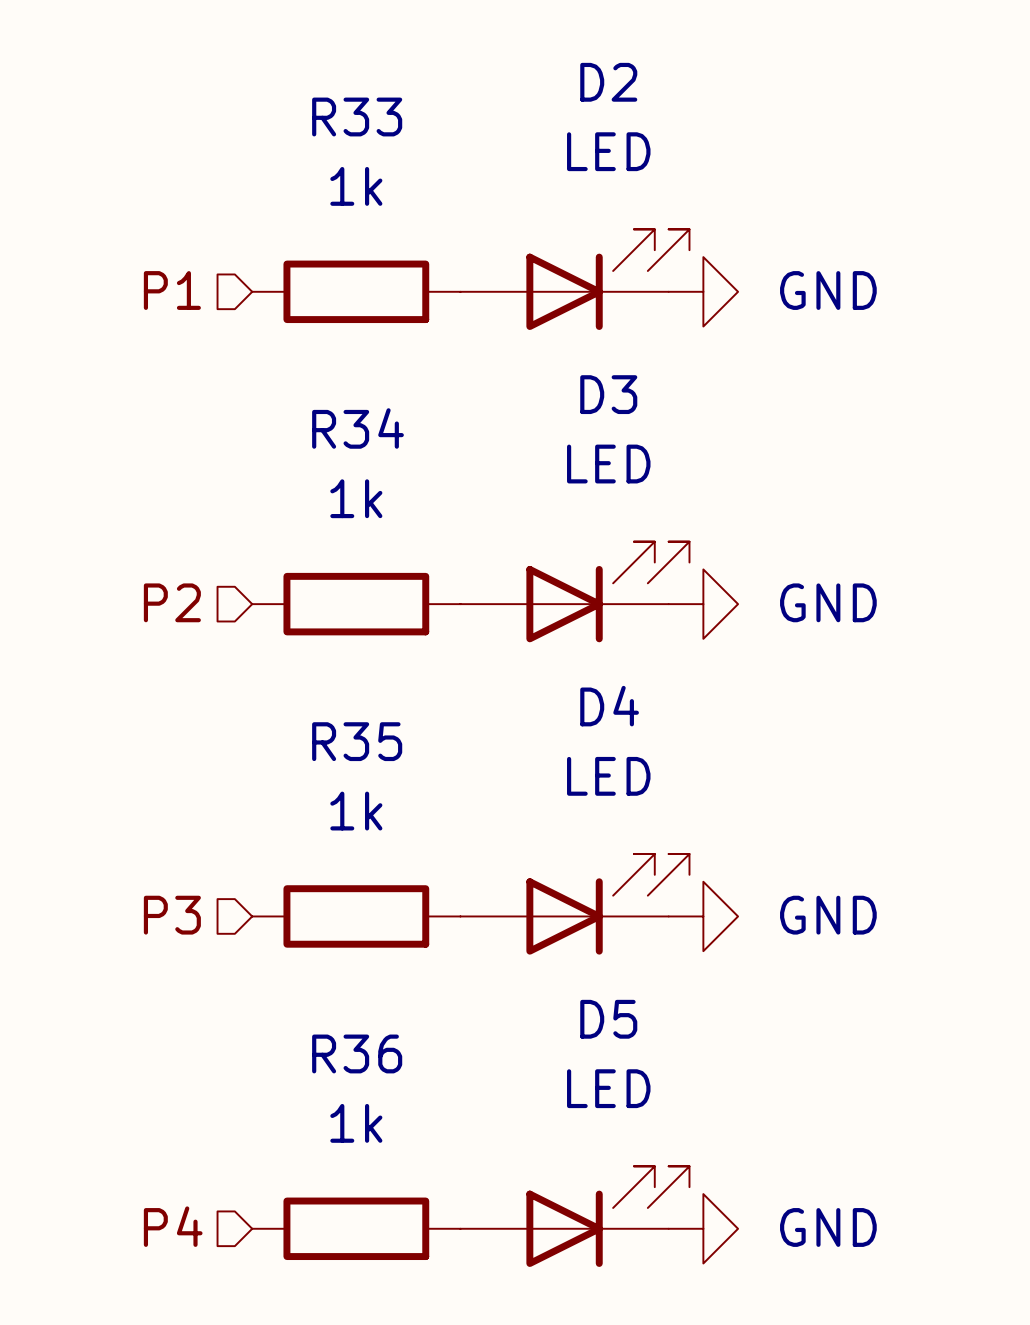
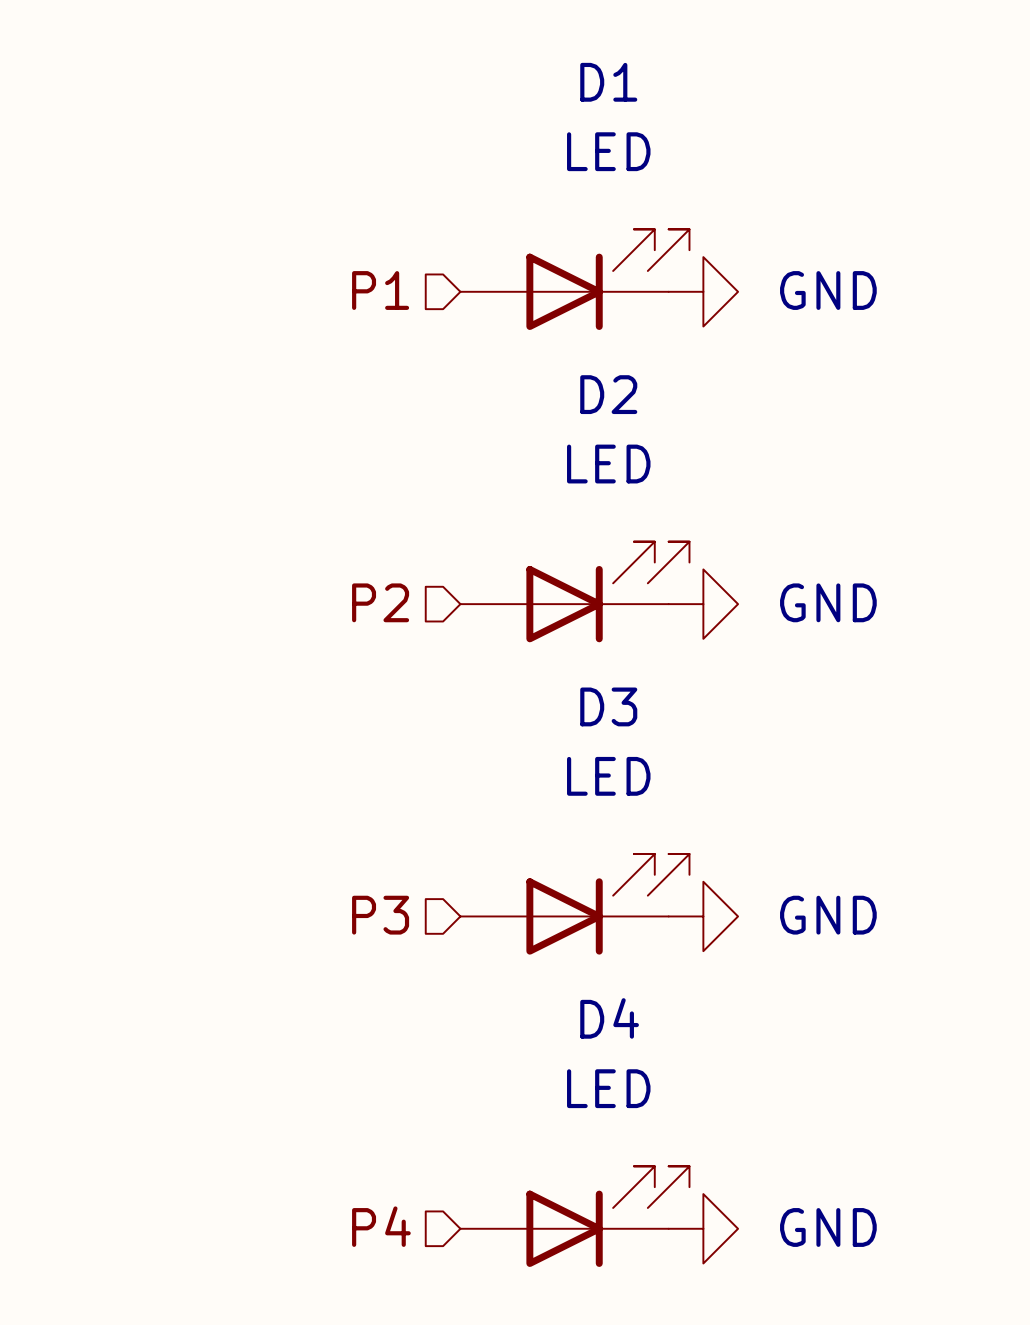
D2 name: D2 (608, 82) -> D1 (608, 82)
hierarchical label position: P1 (172, 290) -> P1 (380, 290)
R33: 1k (356, 291) -> none
D3 name: D3 (608, 394) -> D2 (608, 394)
hierarchical label position: P2 (172, 602) -> P2 (380, 602)
R34: 1k (356, 604) -> none
D4 name: D4 (609, 706) -> D3 (608, 706)
hierarchical label position: P3 (172, 915) -> P3 (380, 915)
R35: 1k (356, 916) -> none
D5 name: D5 (608, 1019) -> D4 (609, 1018)
hierarchical label position: P4 (173, 1226) -> P4 (381, 1226)
R36: 1k (356, 1228) -> none

